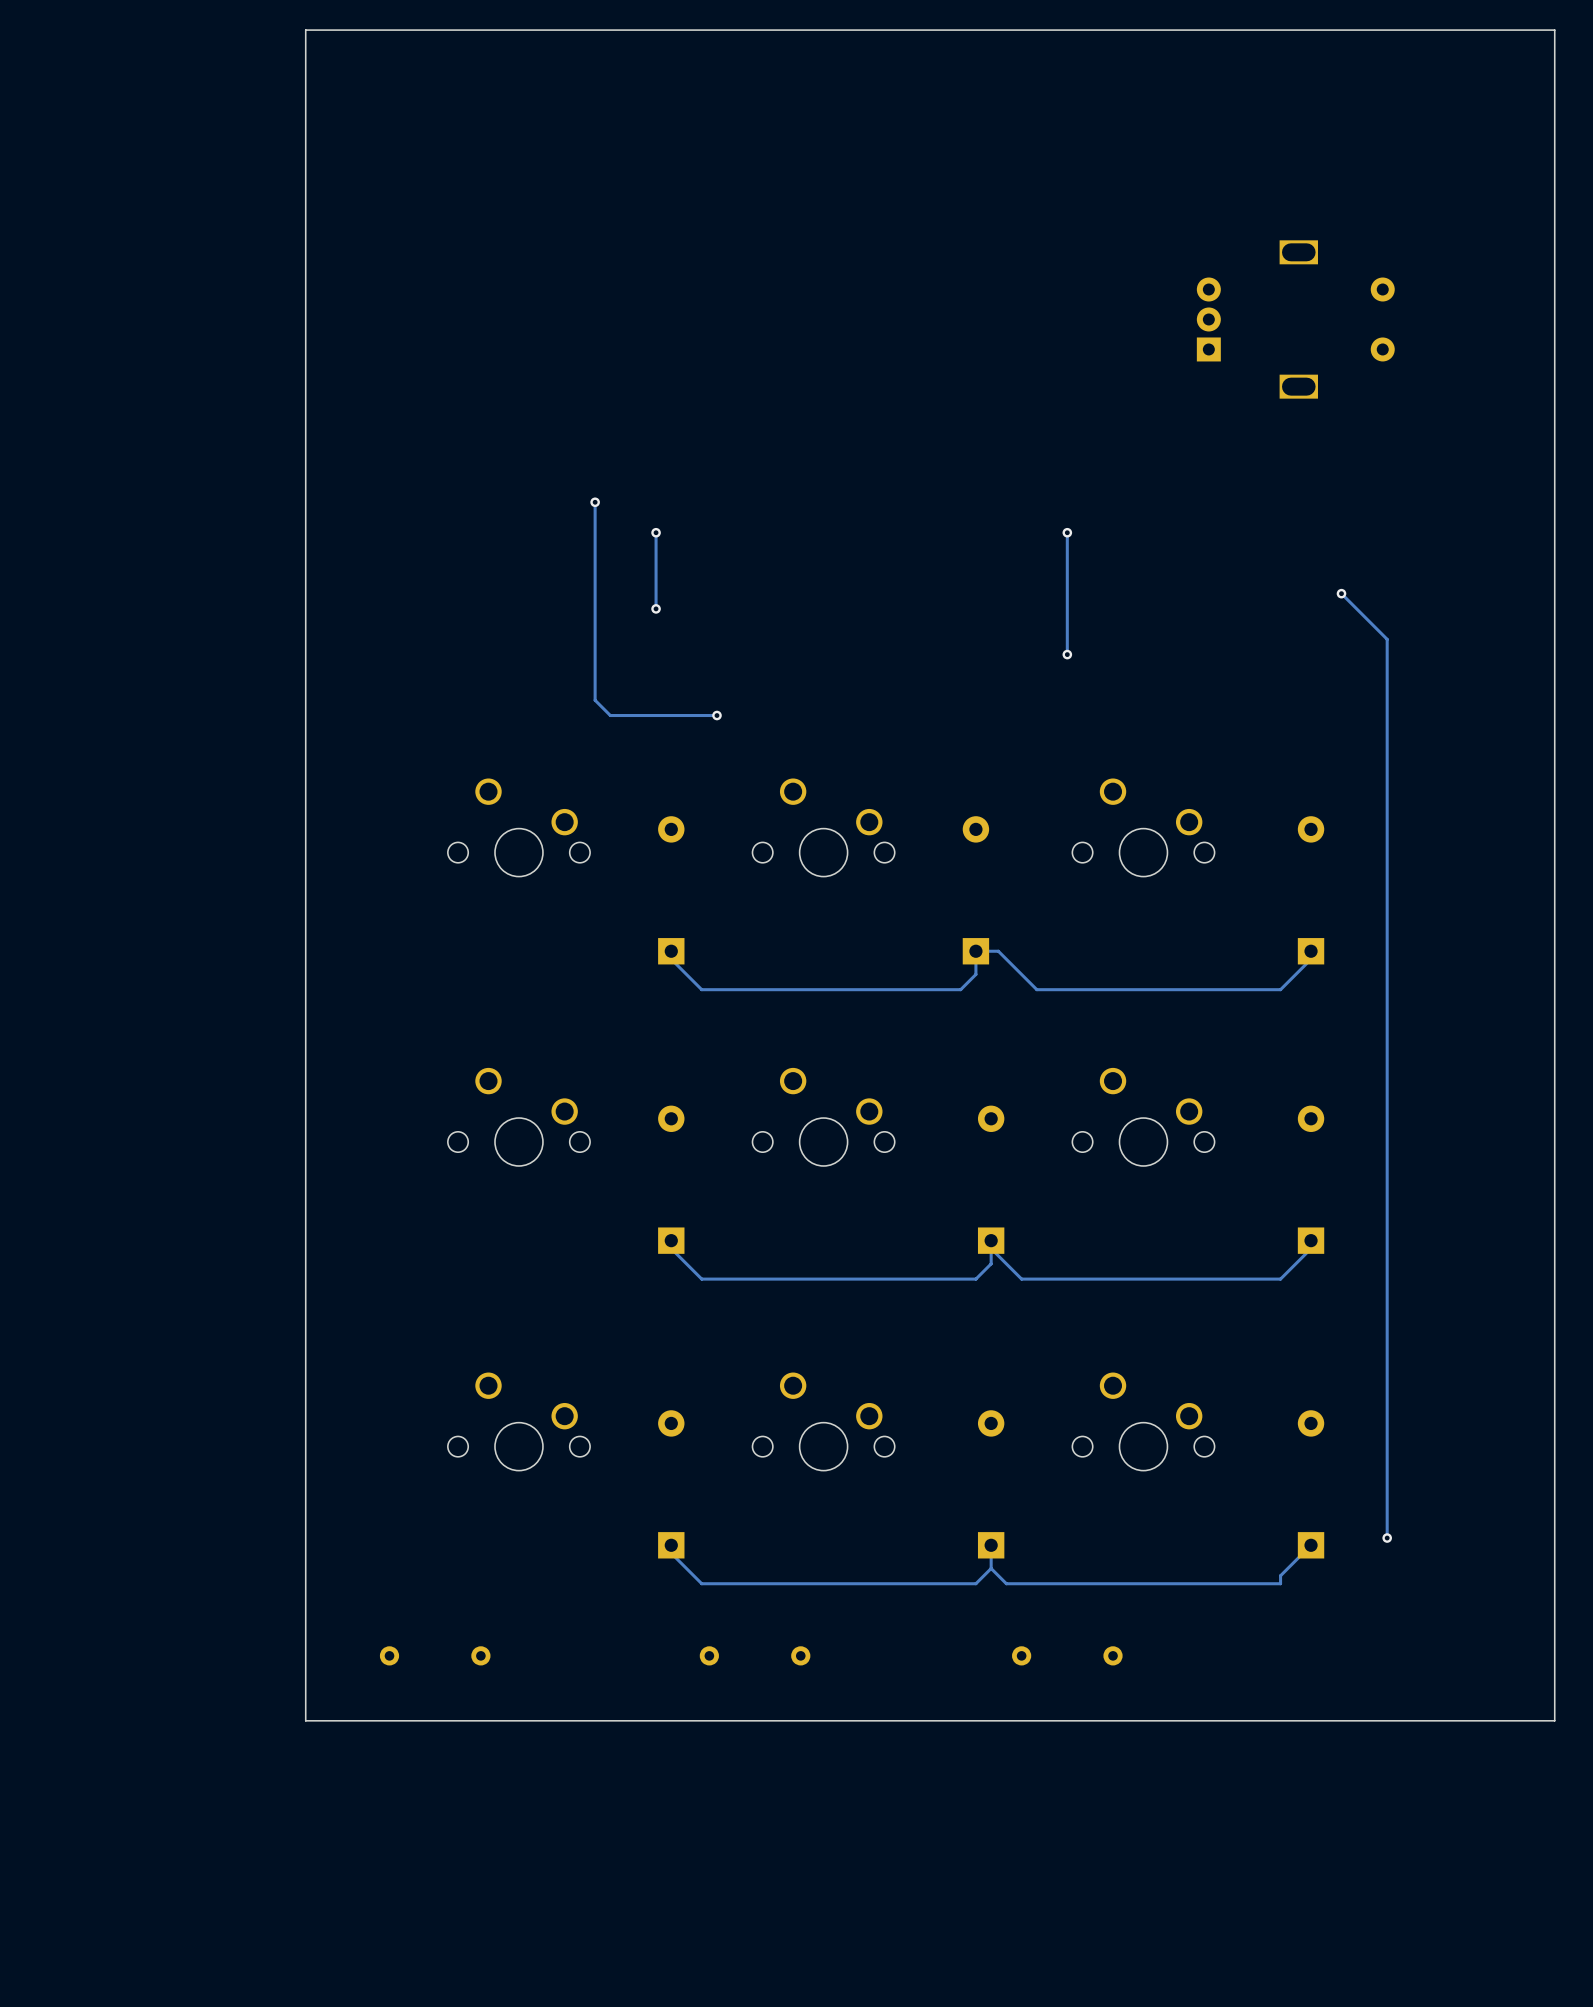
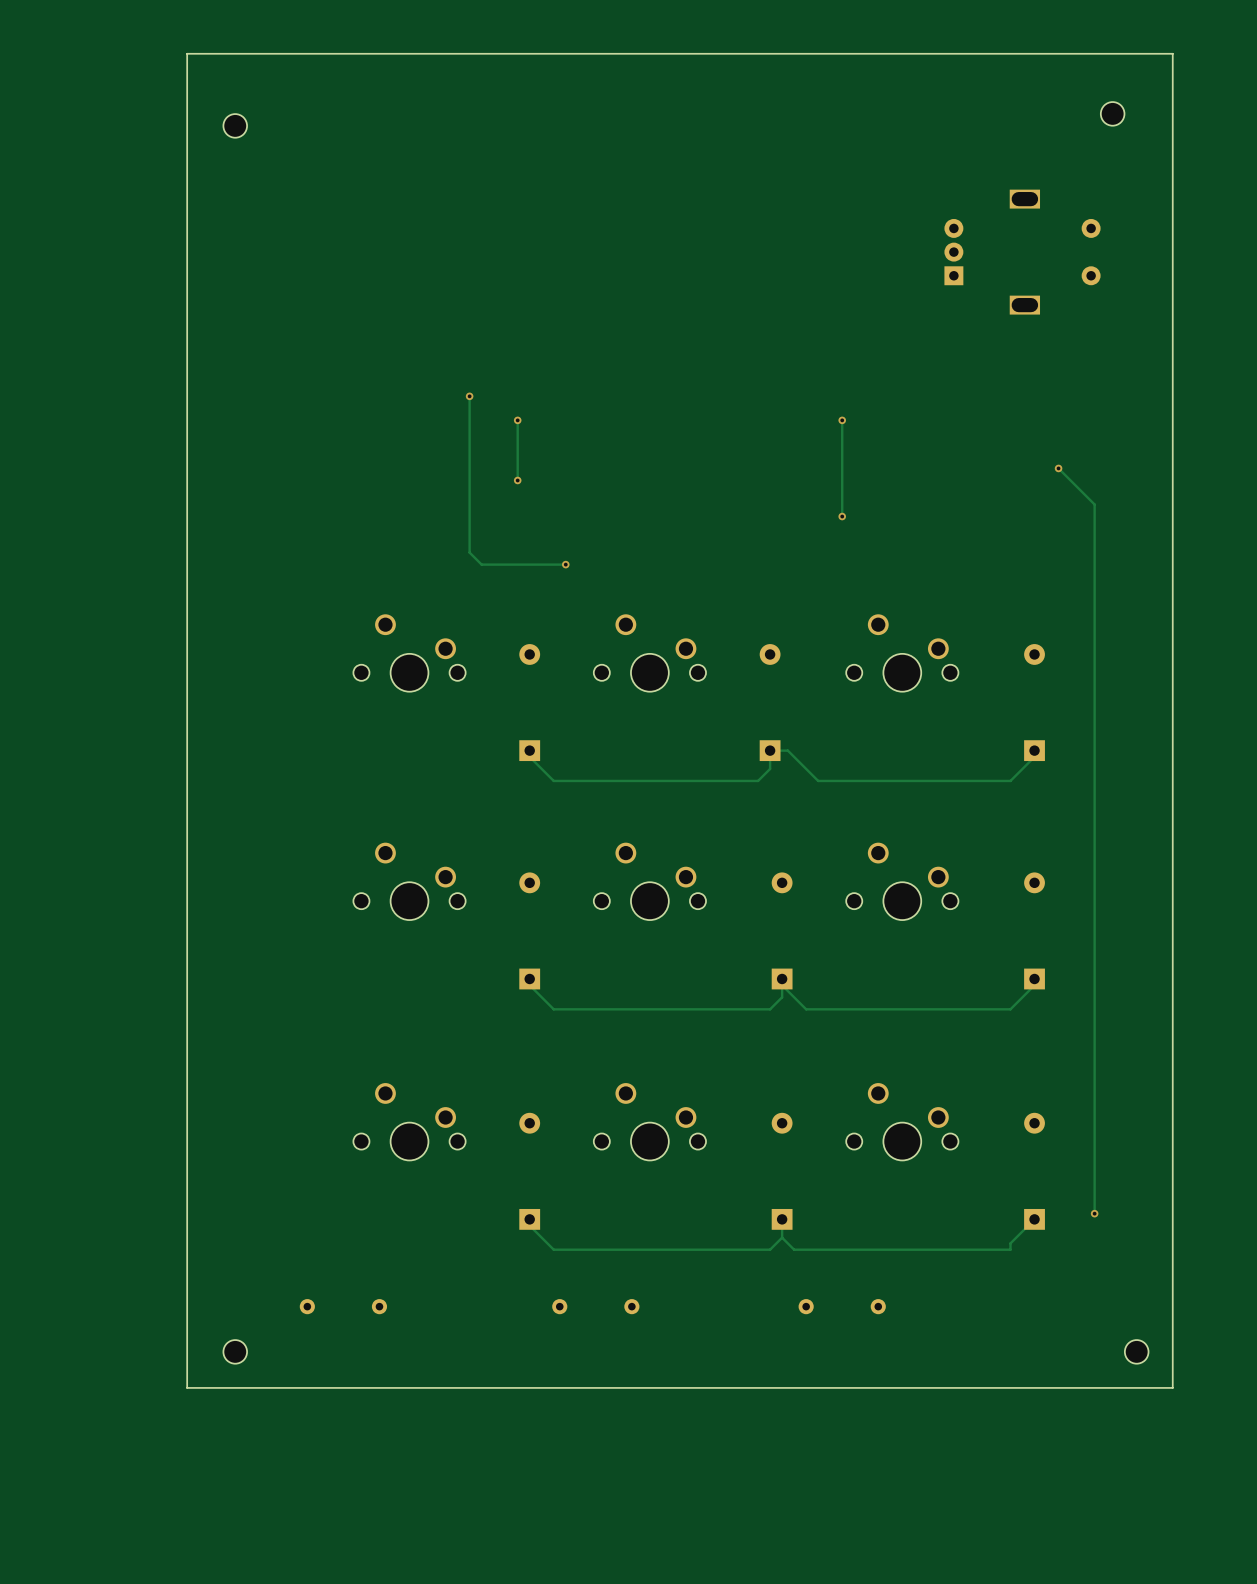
board edge: (1554, 30) (1554, 1720) (305, 1720) (305, 30) (1554, 30) -> (1172, 53) (1172, 1387) (187, 1387) (187, 53) (1172, 53)
part: none -> (1112, 113)
part: none -> (235, 125)
part: none -> (235, 1351)
part: none -> (1136, 1351)

